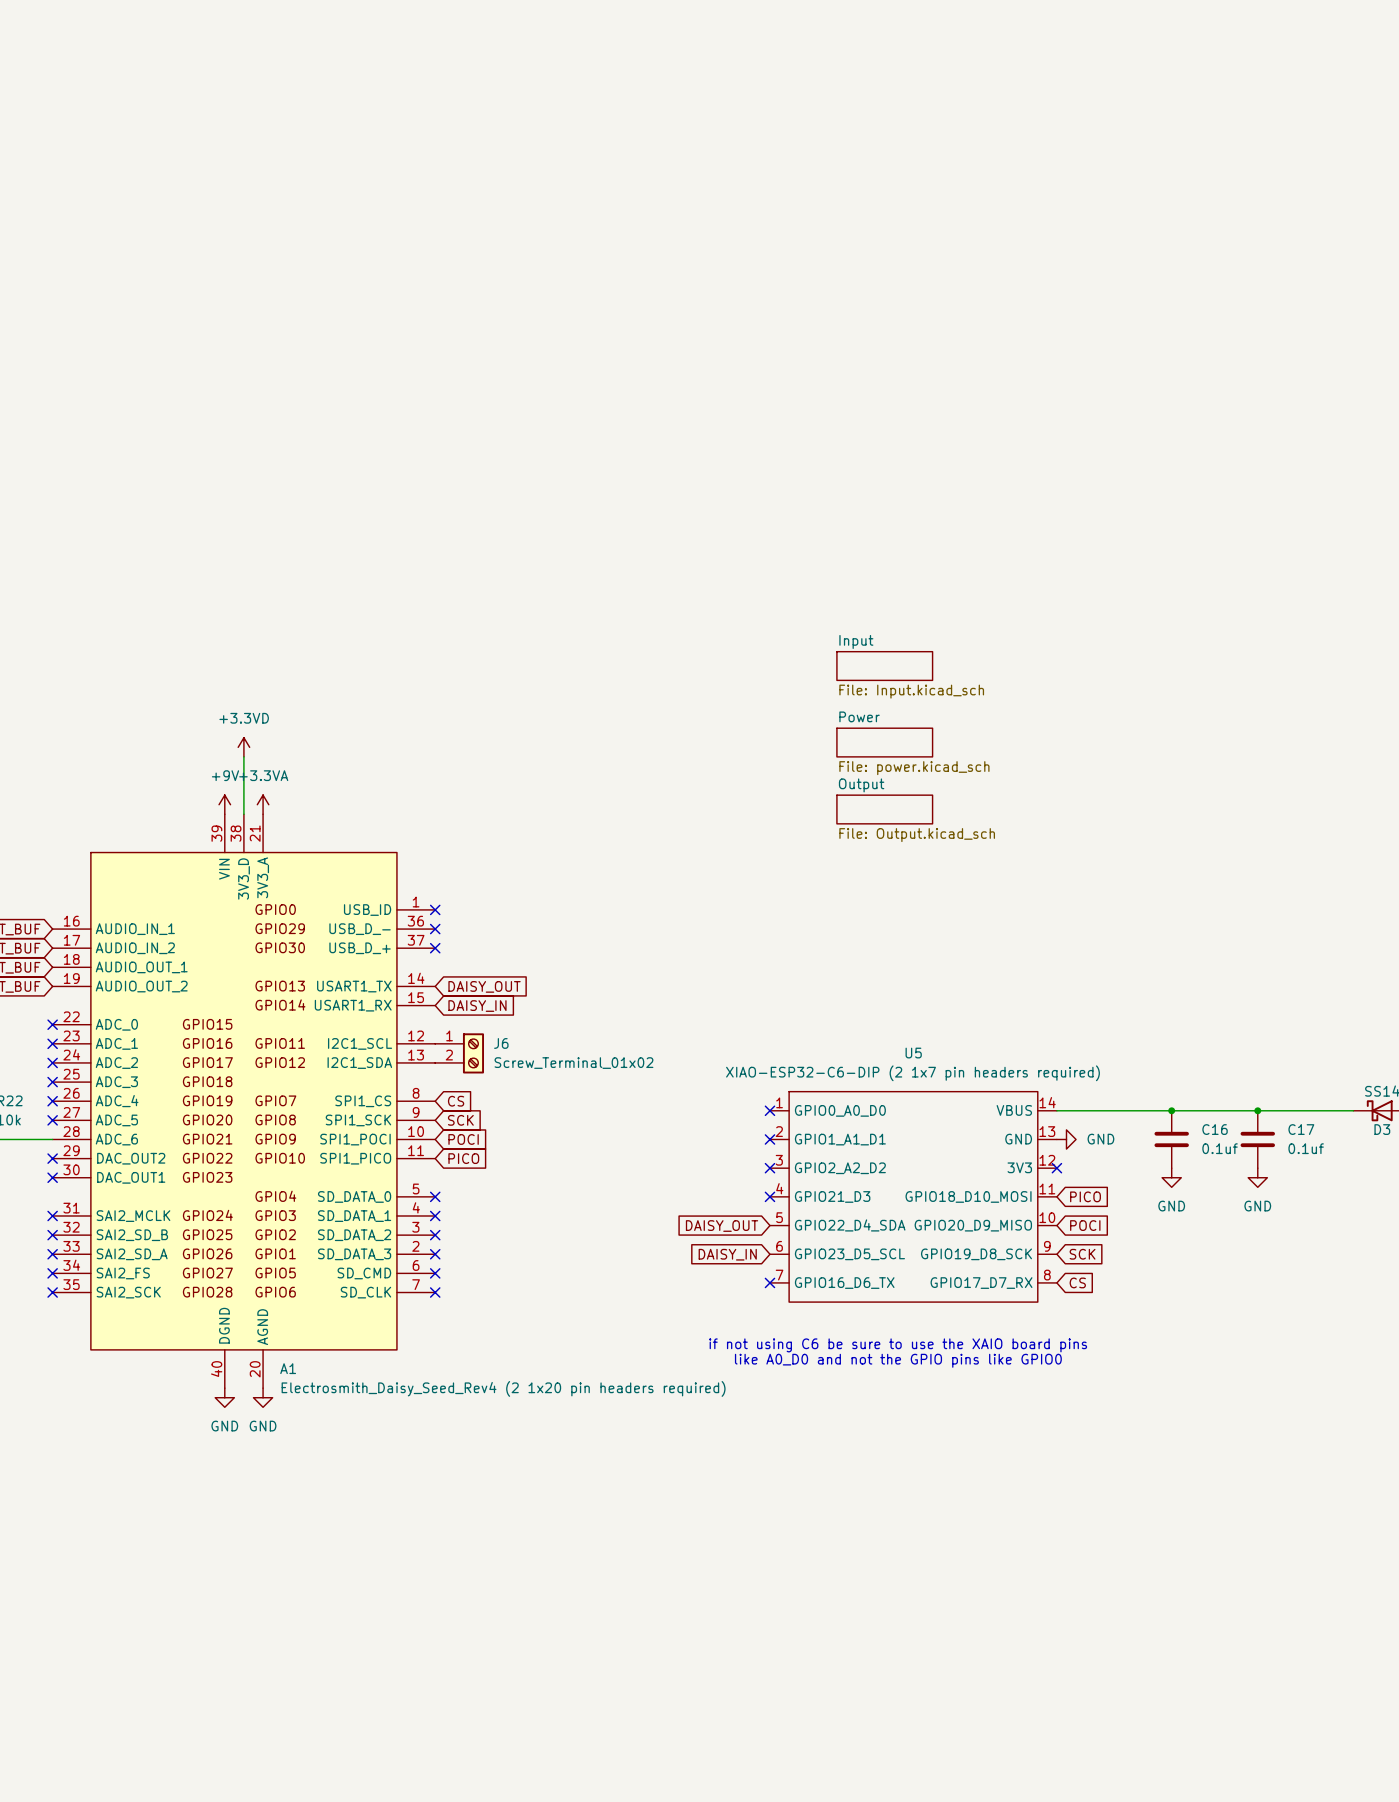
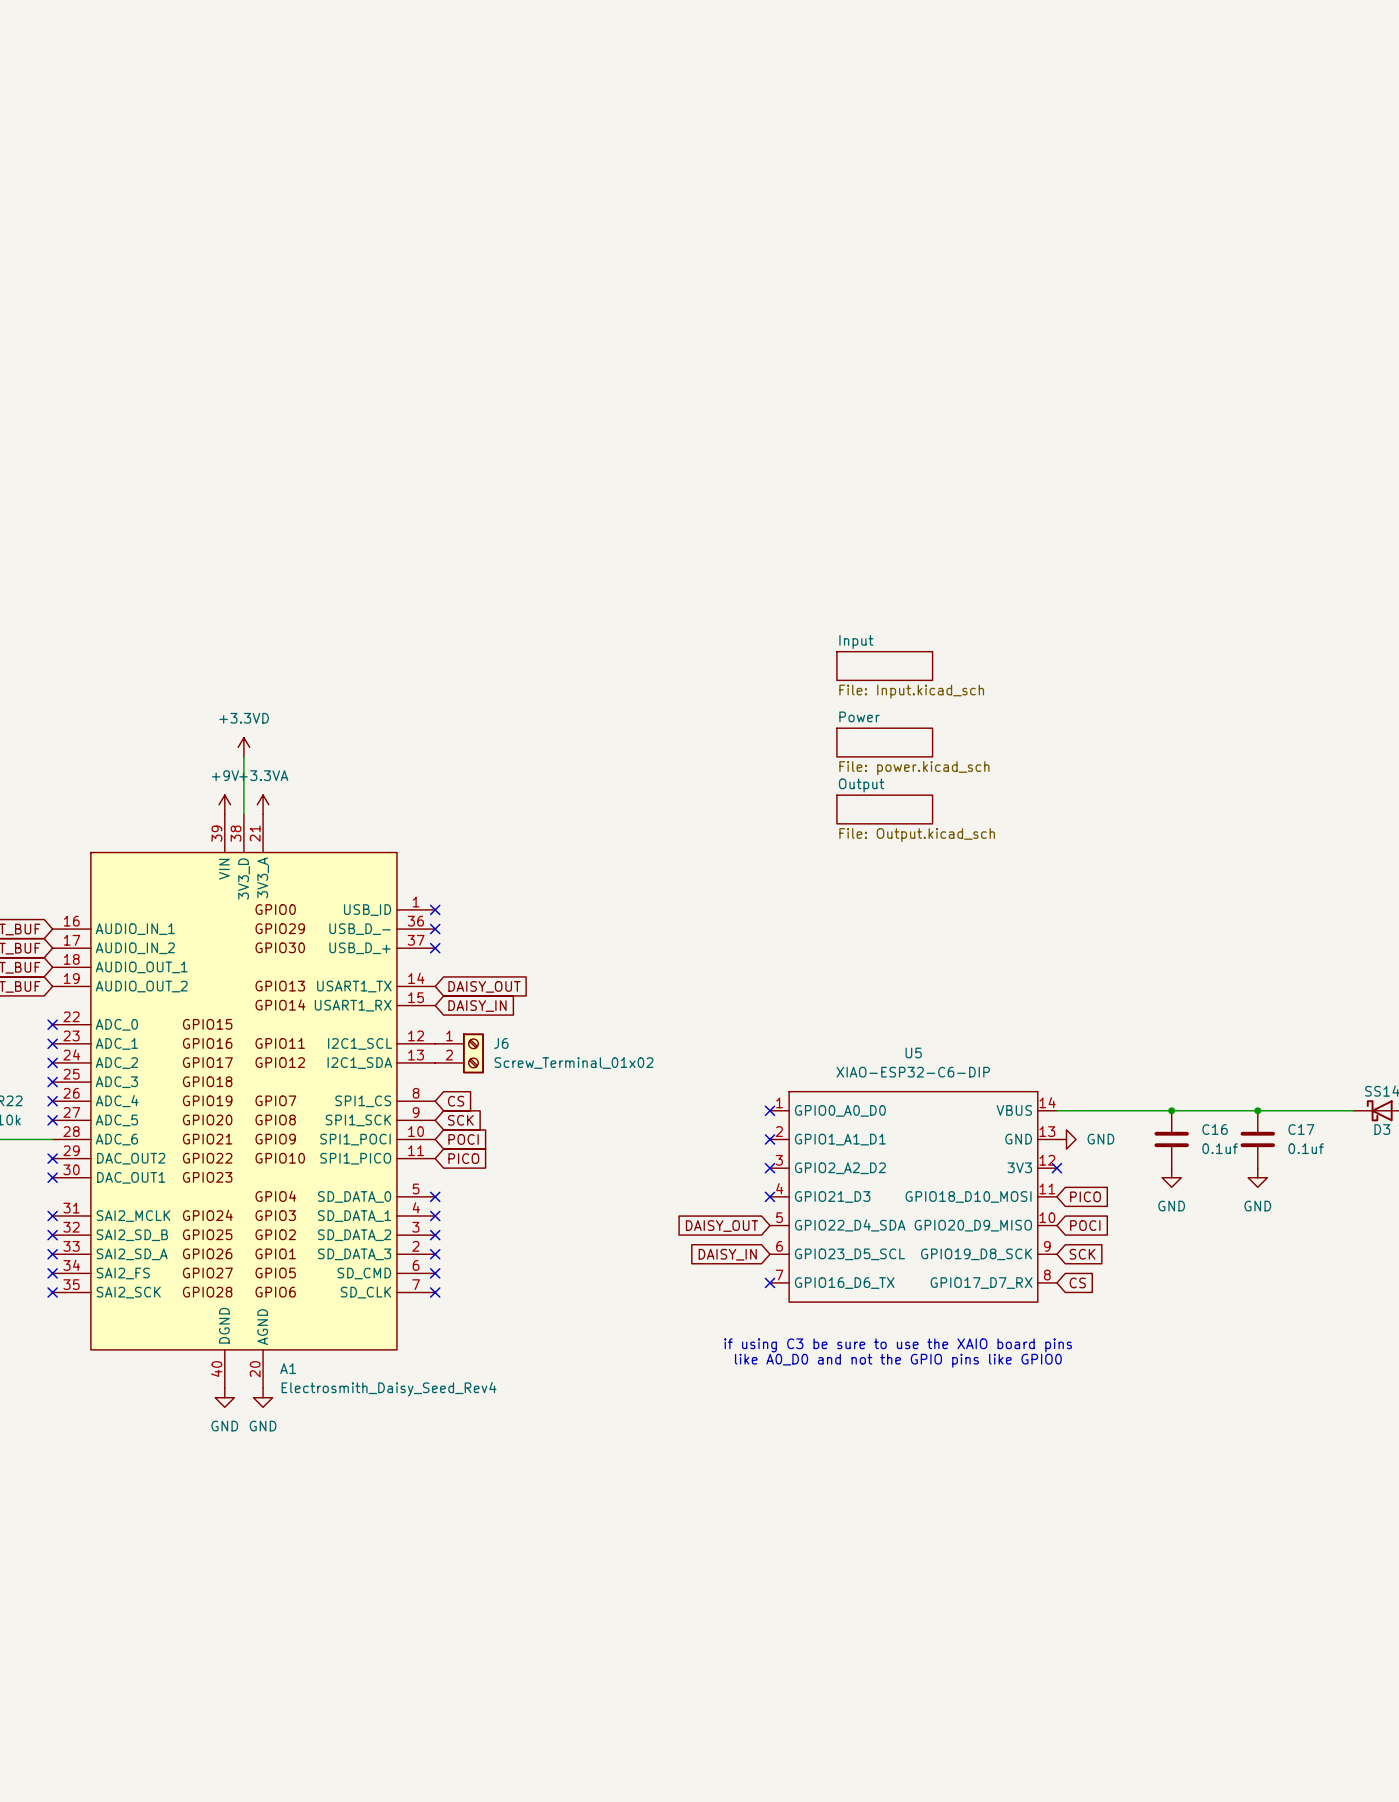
U5 value: XIAO-ESP32-C6-DIP (2 1x7 pin headers required) (912, 1073) -> XIAO-ESP32-C6-DIP (913, 1072)
text: if not using C6 be sure to use the XAIO board pins (898, 1345) -> if using C3 be sure to use the XAIO board pins (898, 1345)
A1 value: Electrosmith_Daisy_Seed_Rev4 (2 1x20 pin headers required) (503, 1388) -> Electrosmith_Daisy_Seed_Rev4 (389, 1389)

